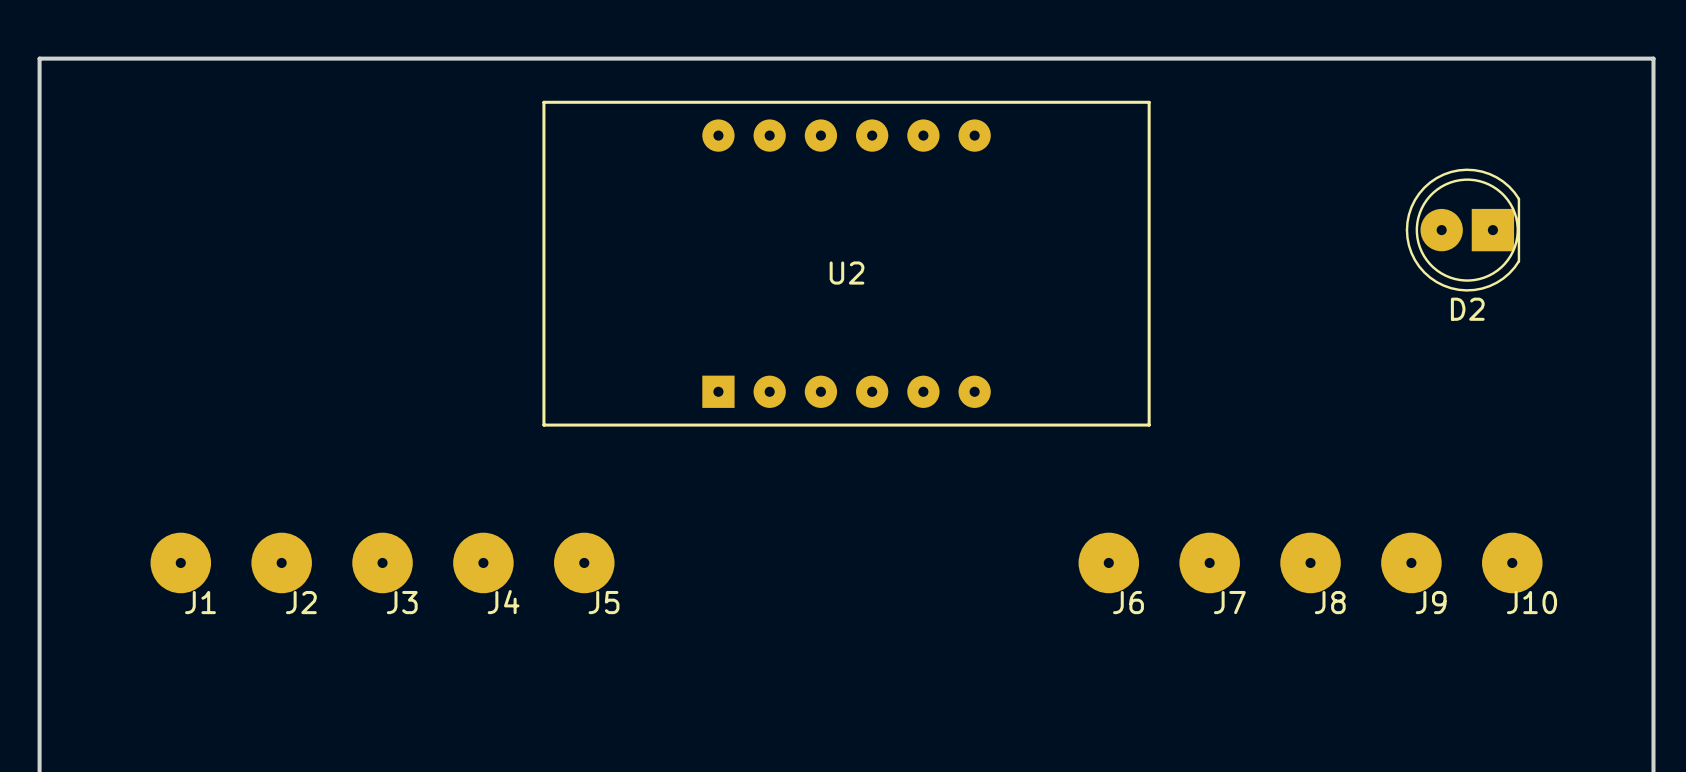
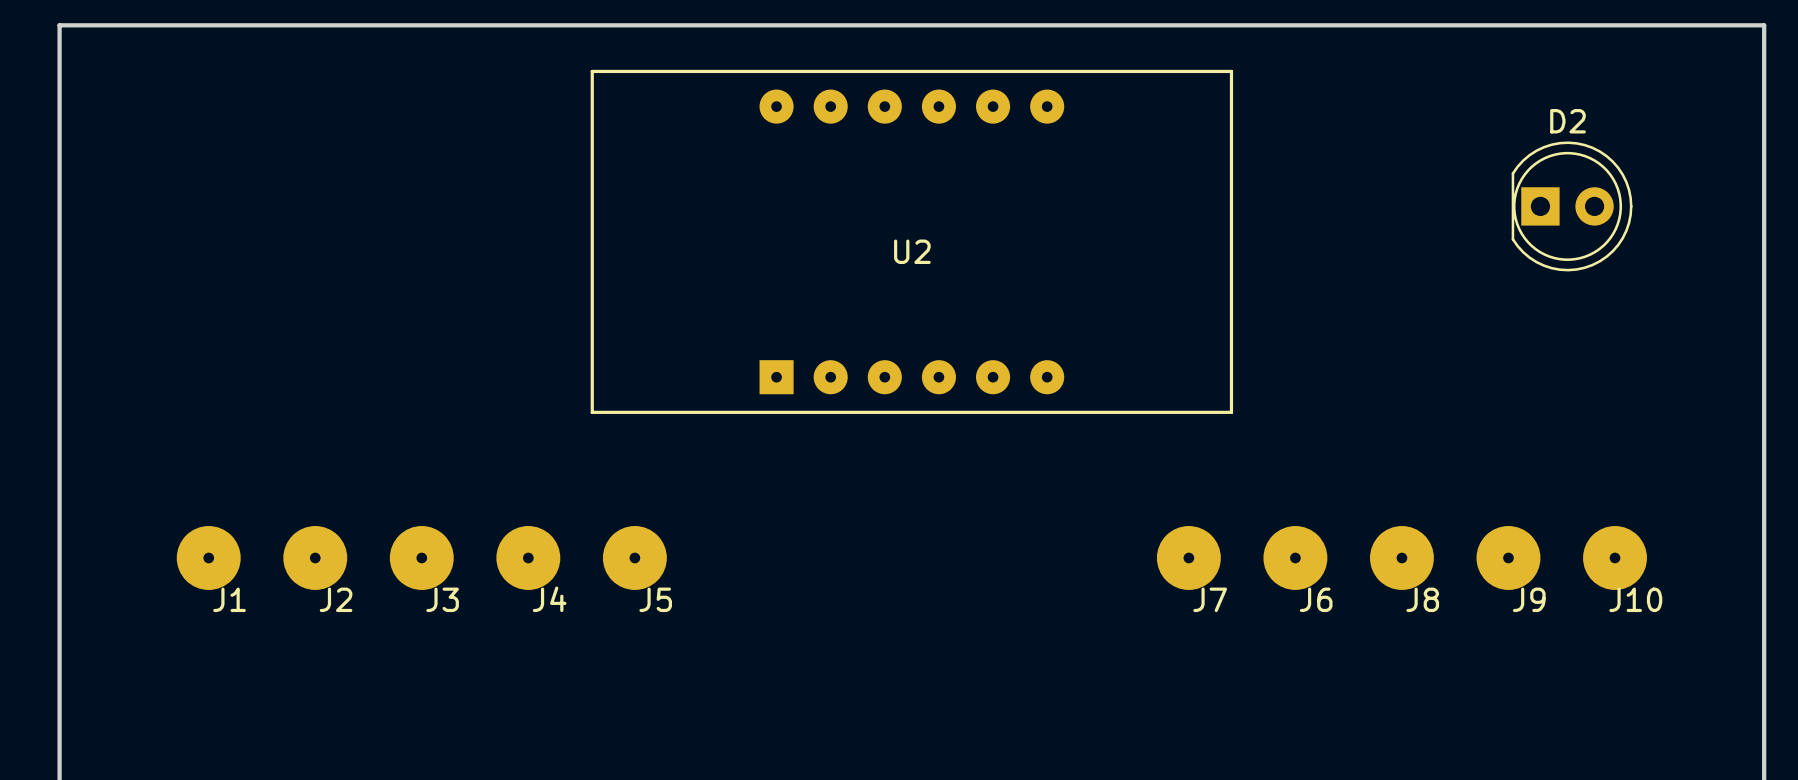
D2 footprint: [1405, 168, 1521, 292] -> [1511, 141, 1633, 272]
D2 name position: D2 (1467, 309) -> D2 (1568, 121)
J6 name: J6 (1128, 602) -> J7 (1210, 599)
J7 name: J7 (1229, 602) -> J6 (1316, 599)

